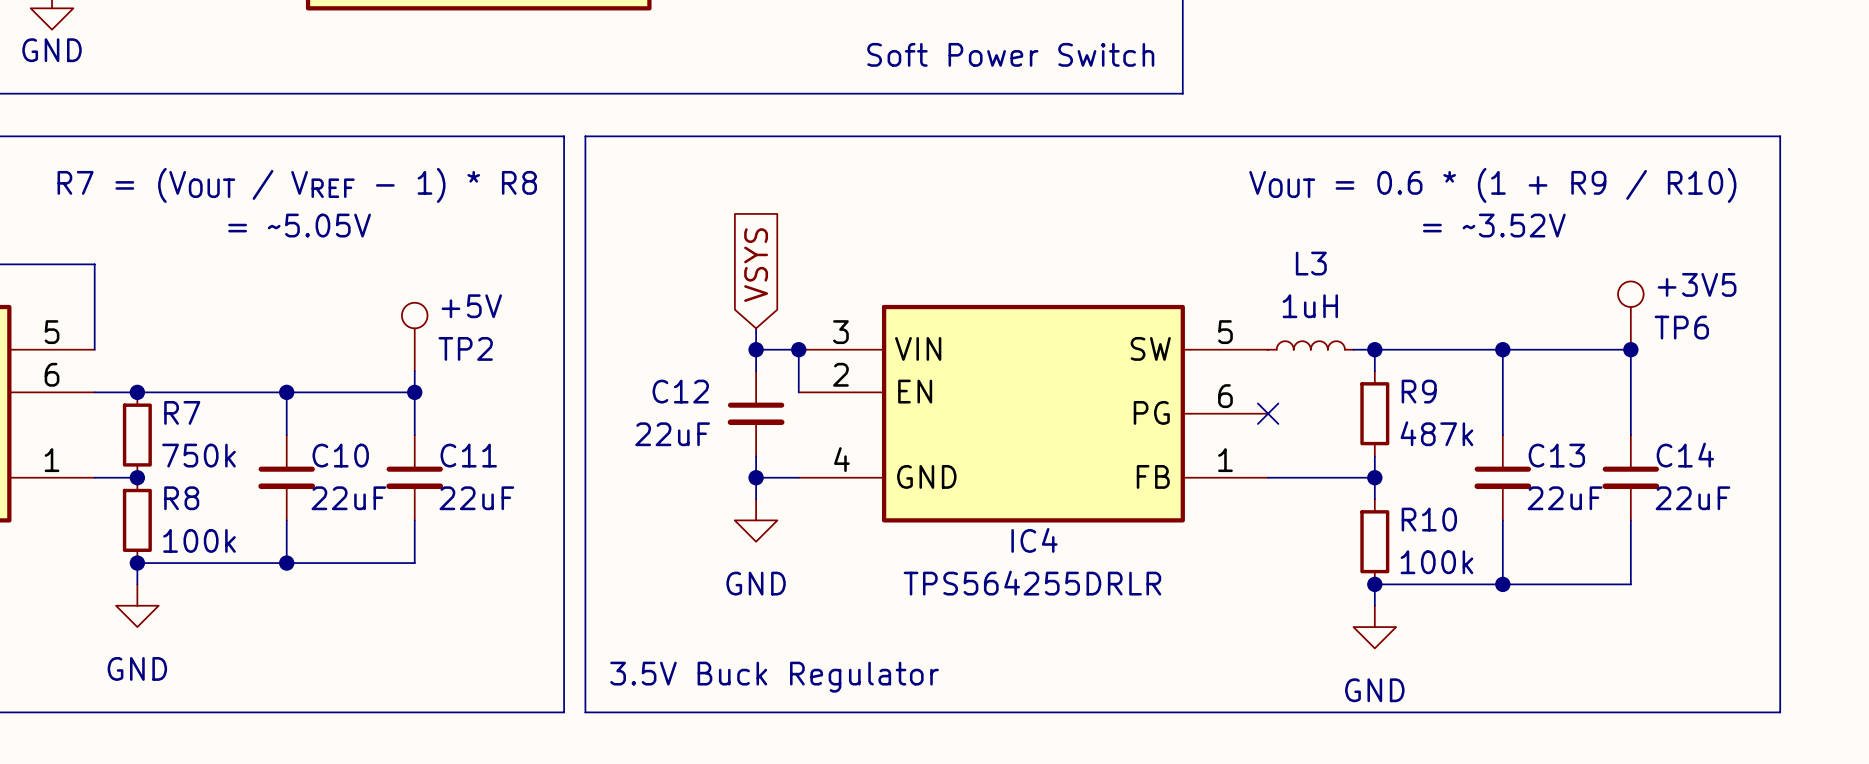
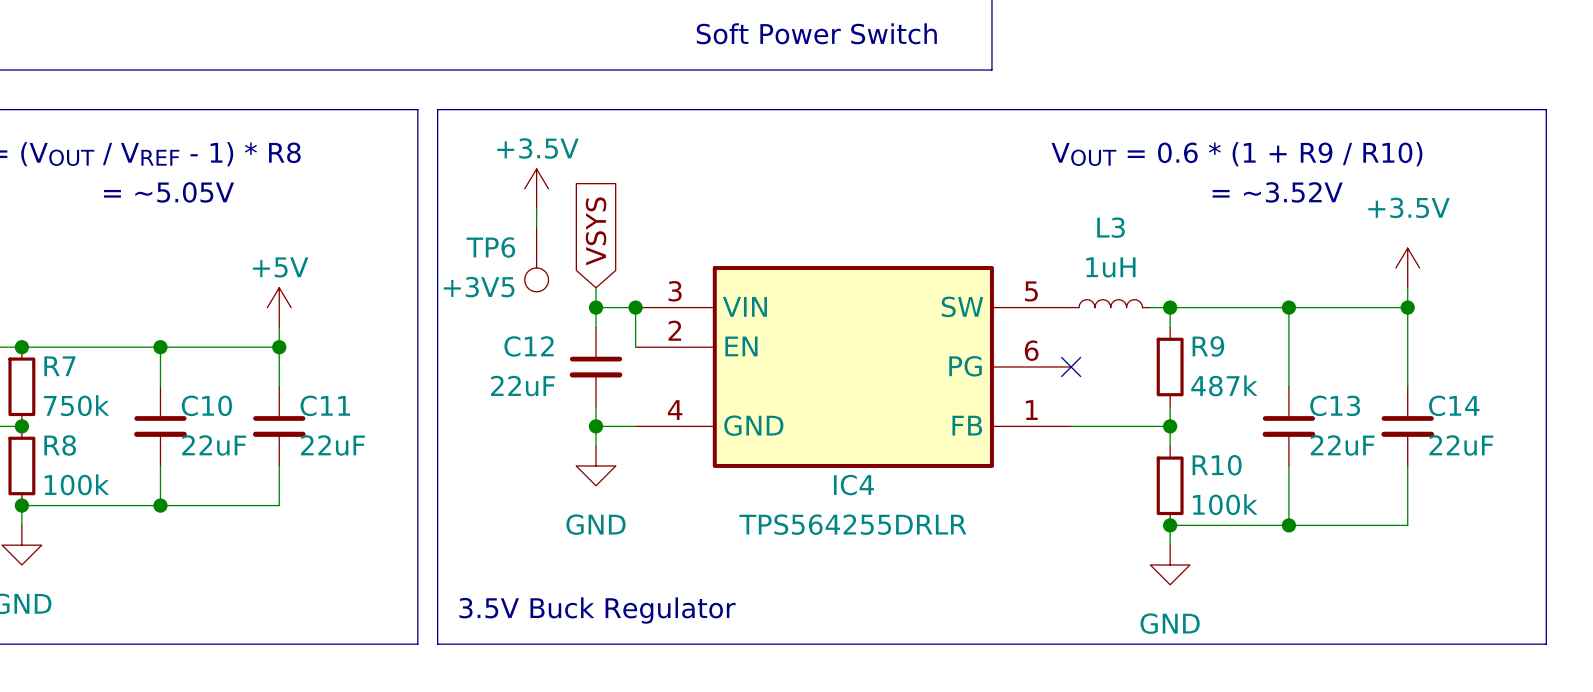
power symbol: none -> +3.5V (536, 188)
wire: none -> (536, 208) (536, 228)
TP6 rotation: 0° (1630, 294) -> 180° (536, 279)
power symbol: none -> +3.5V (1407, 268)
TP6 position: (1630, 315) -> (536, 260)
TP2: +5V (414, 336) -> none
power symbol: none -> +5V (279, 307)

